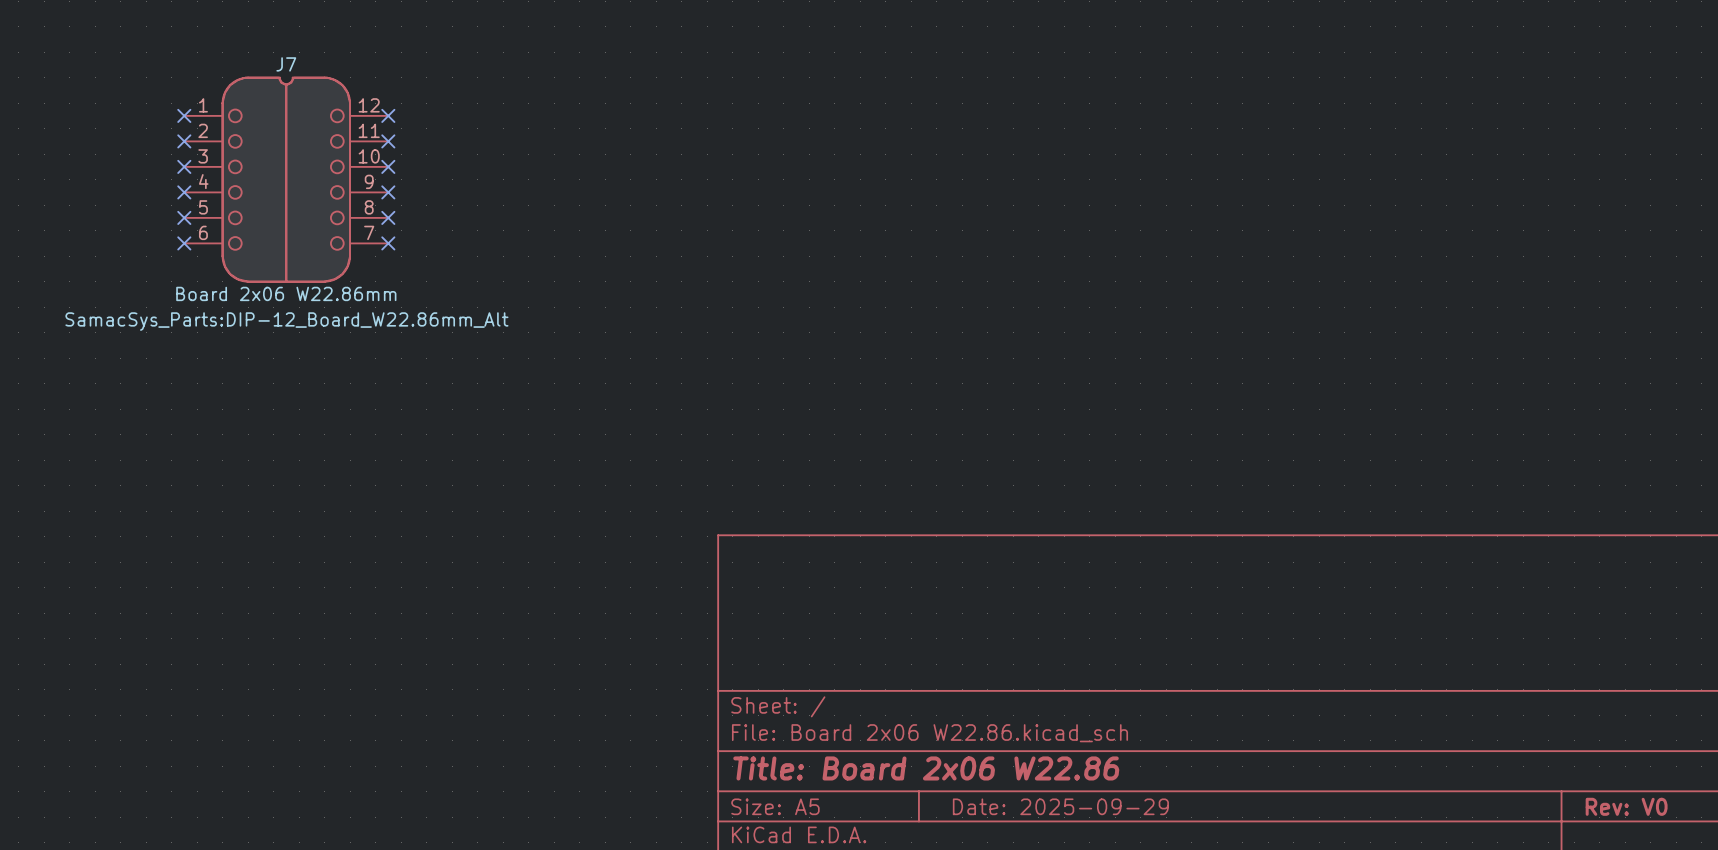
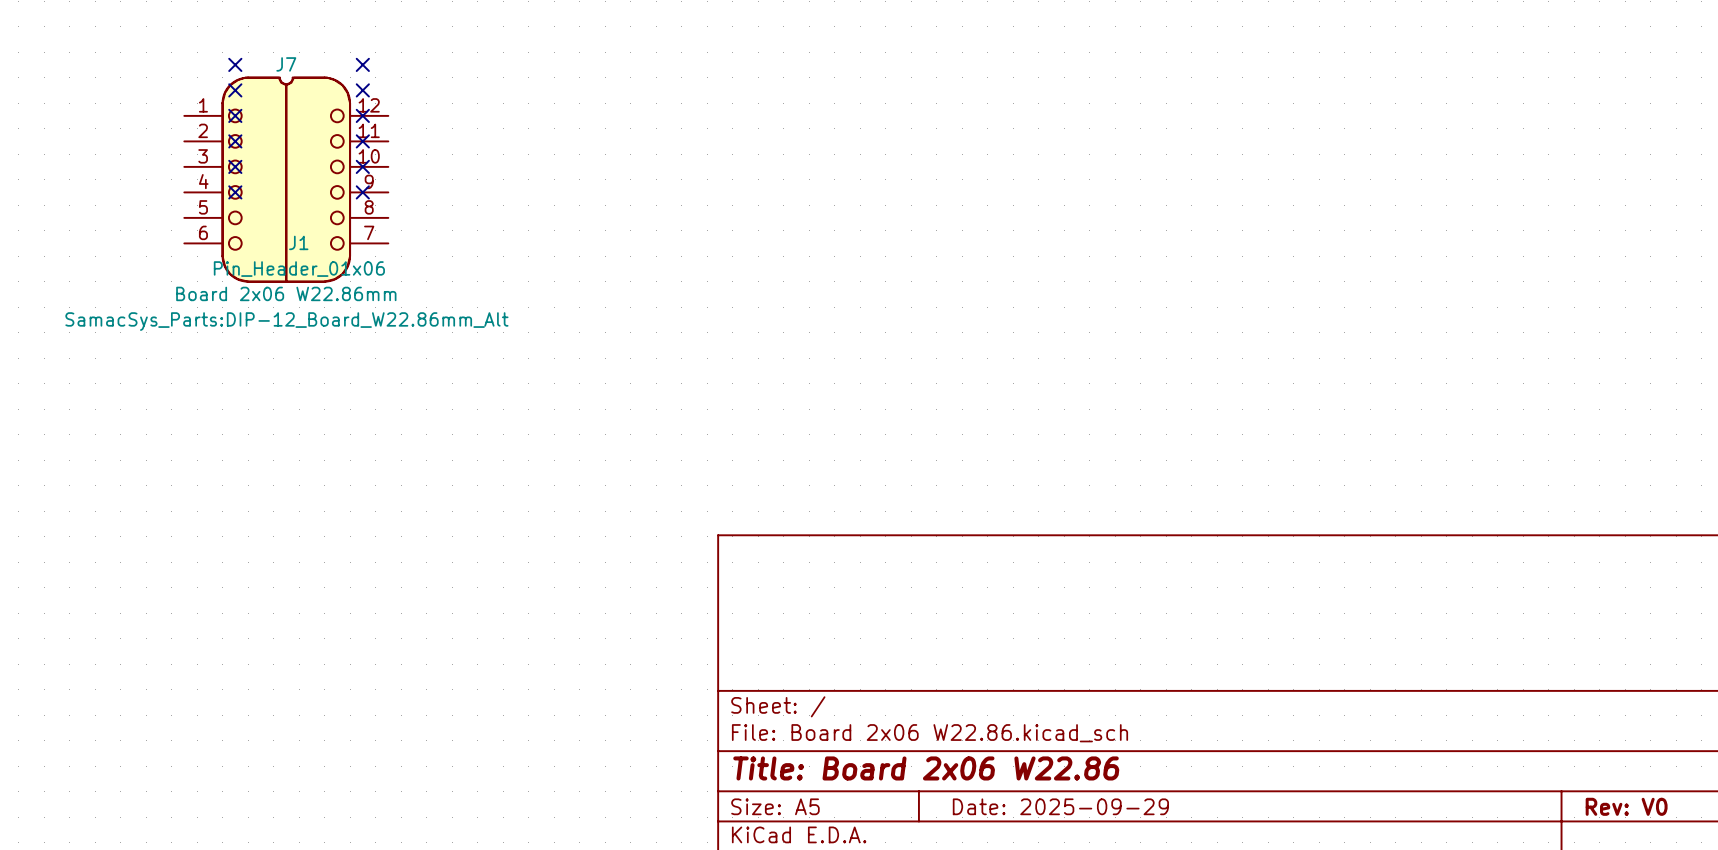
no-connect mark: none -> (235, 64)
no-connect mark: none -> (362, 64)
no-connect mark: none -> (235, 90)
no-connect mark: none -> (362, 90)
no-connect mark: (184, 115) -> none
no-connect mark: none -> (235, 115)
no-connect mark: none -> (362, 115)
no-connect mark: (388, 115) -> none
no-connect mark: (184, 141) -> none
no-connect mark: none -> (235, 141)
no-connect mark: none -> (362, 141)
no-connect mark: (388, 141) -> none
no-connect mark: (184, 166) -> none
no-connect mark: none -> (235, 166)
no-connect mark: none -> (362, 166)
no-connect mark: (388, 166) -> none
no-connect mark: (184, 192) -> none
no-connect mark: none -> (235, 192)
no-connect mark: none -> (362, 192)
no-connect mark: (388, 192) -> none
no-connect mark: (184, 217) -> none
no-connect mark: (388, 217) -> none
no-connect mark: (184, 243) -> none
no-connect mark: (388, 243) -> none
J1: none -> Pin_Header_01x06 (299, 256)

